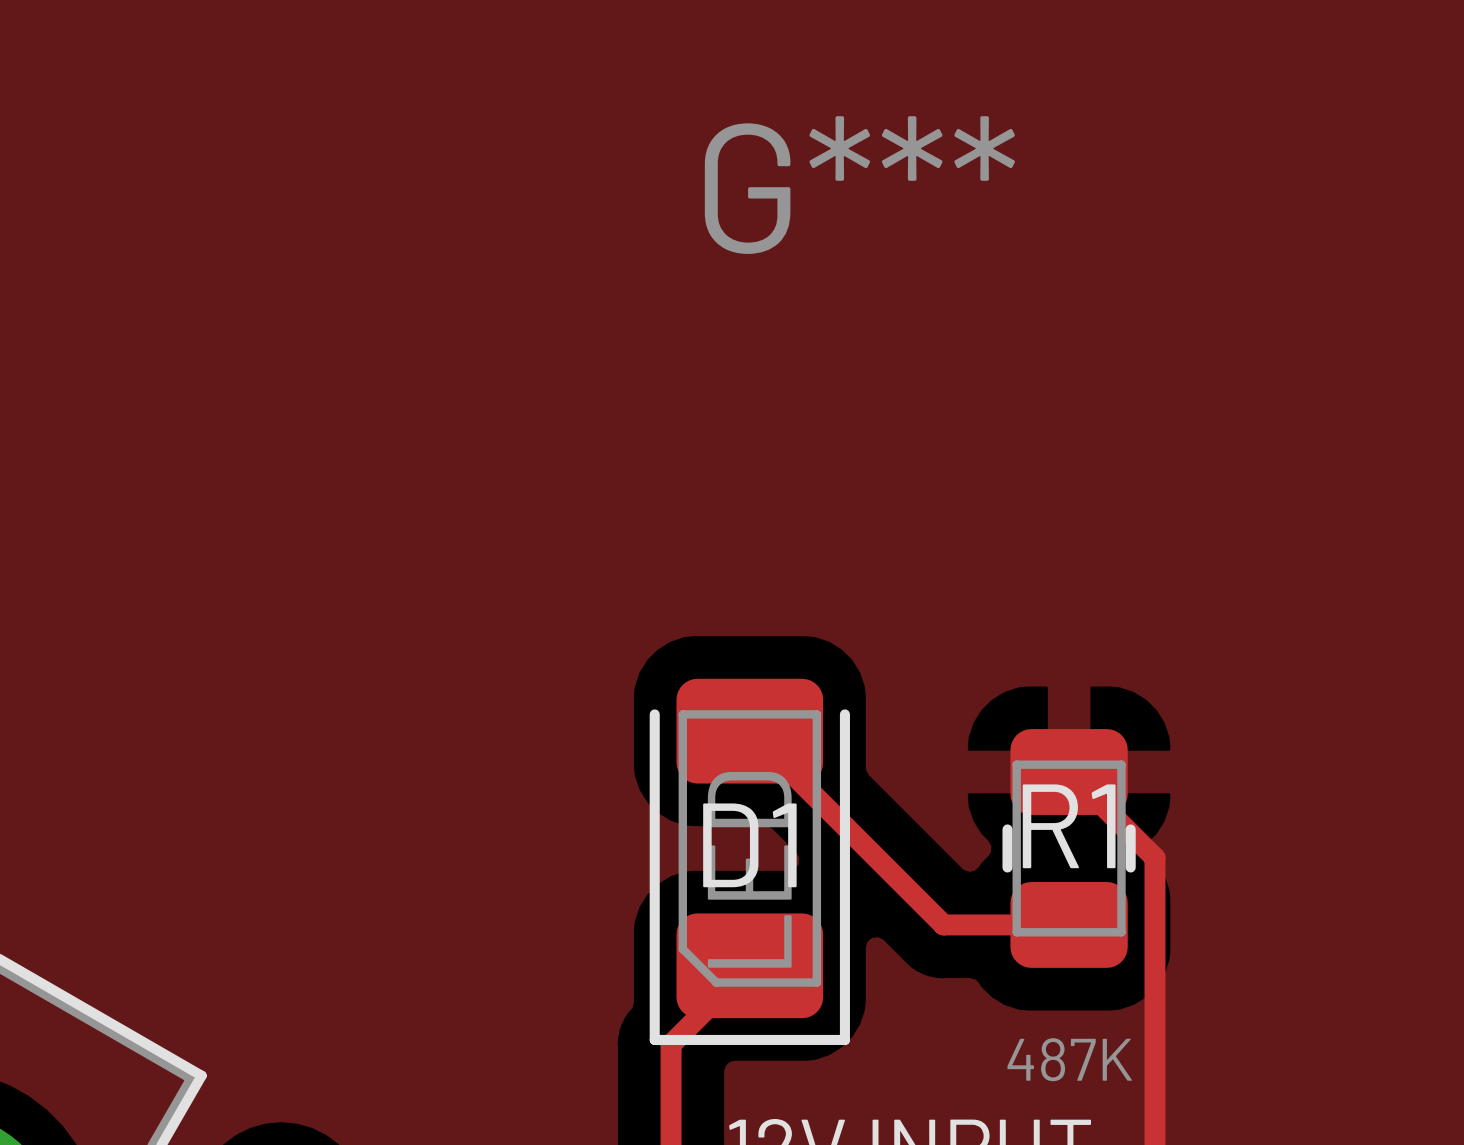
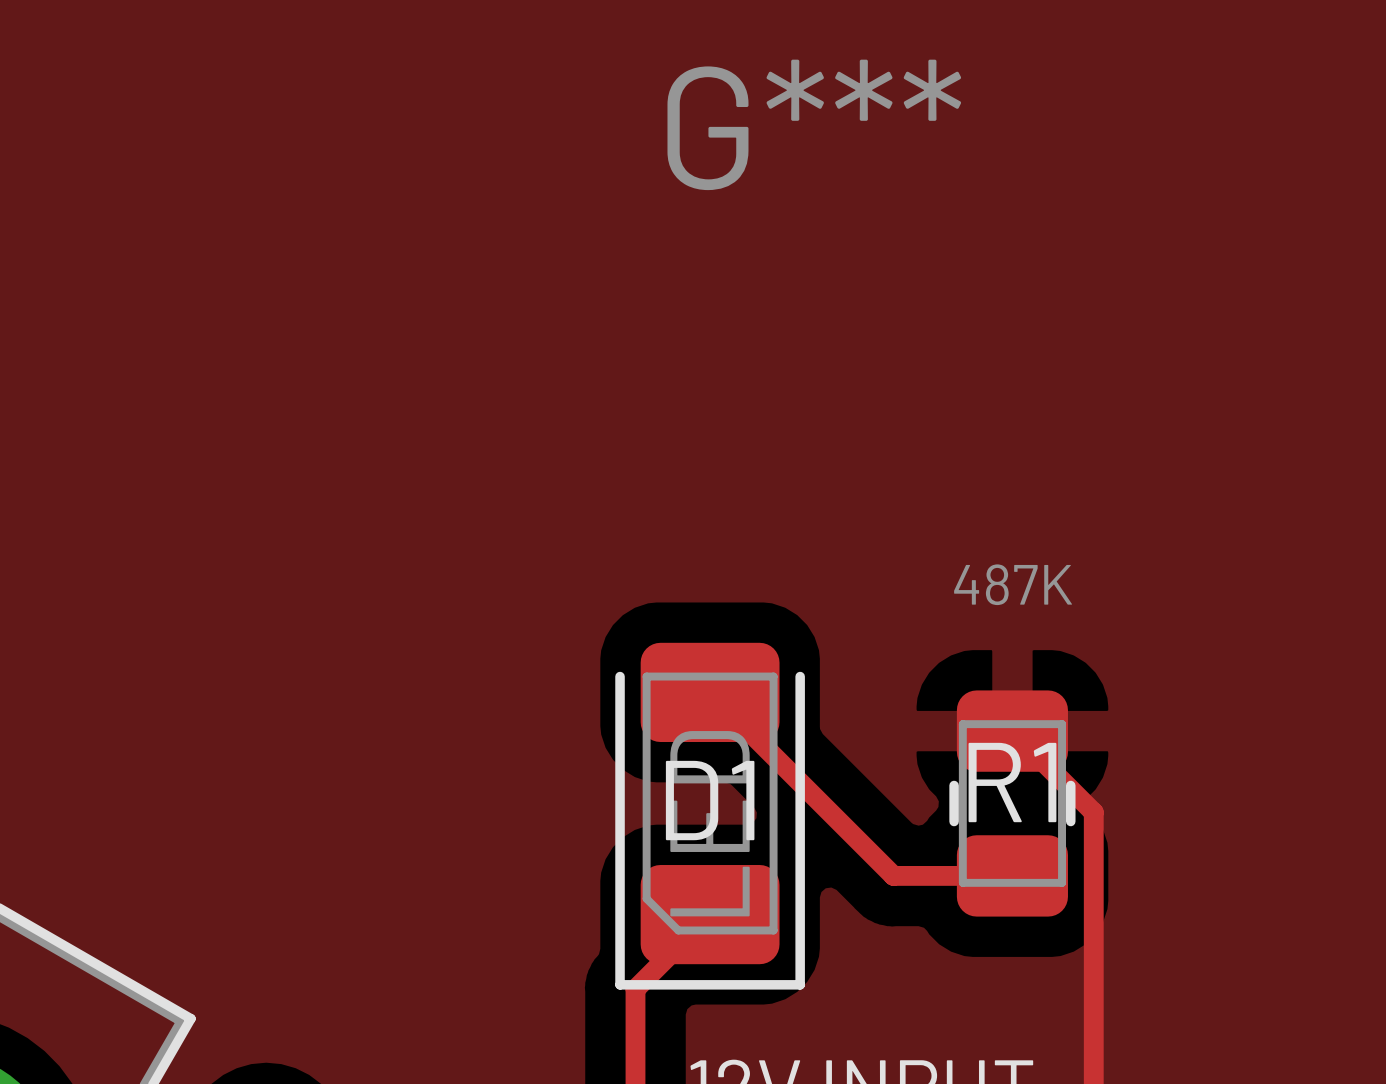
G*** position: (859, 185) -> (814, 124)
R1 value position: 487K (1069, 1059) -> 487K (1013, 584)

